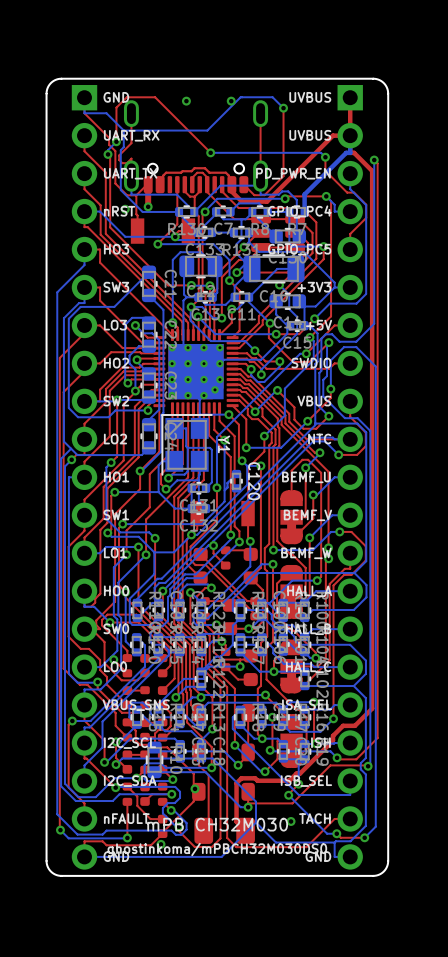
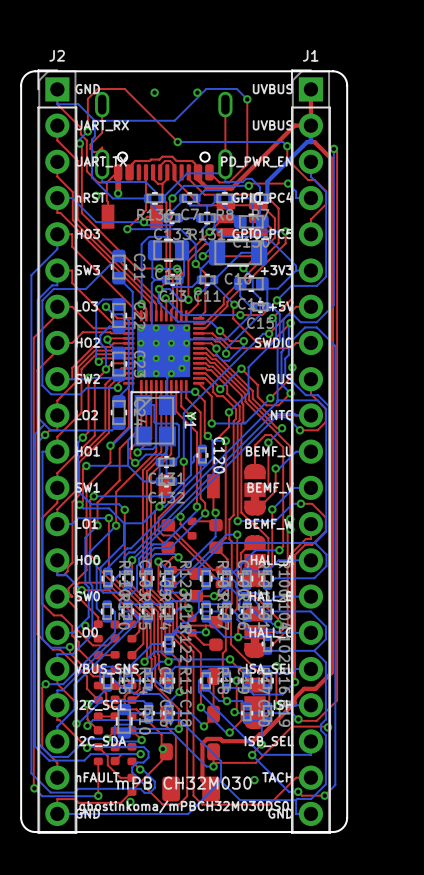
J2 side: top (84, 477) -> bottom (57, 451)
J1 side: top (350, 477) -> bottom (310, 451)

